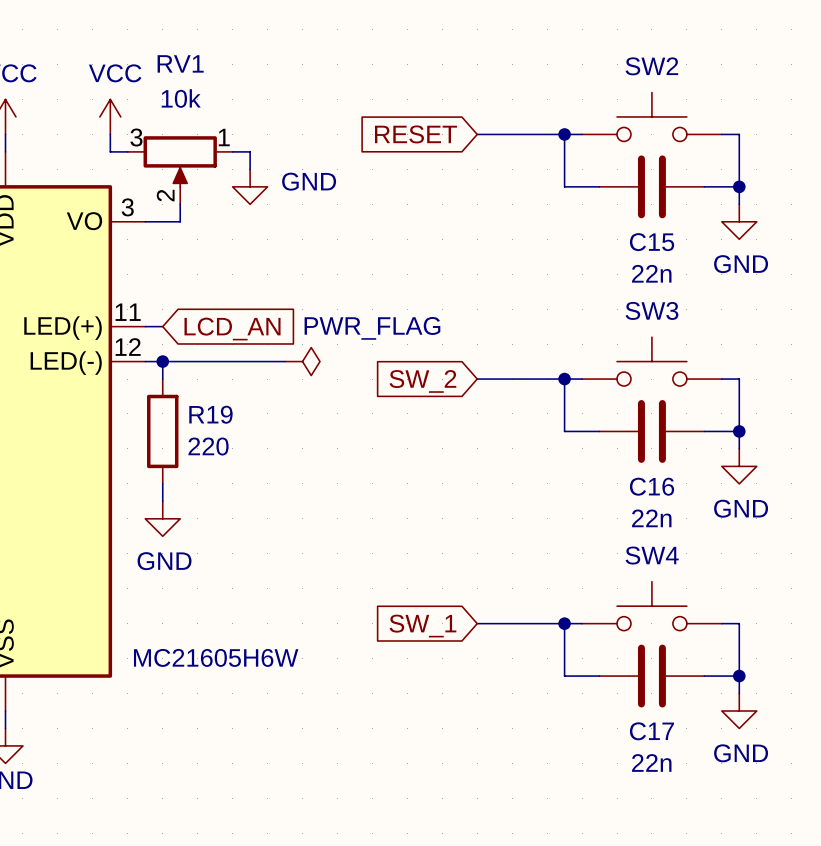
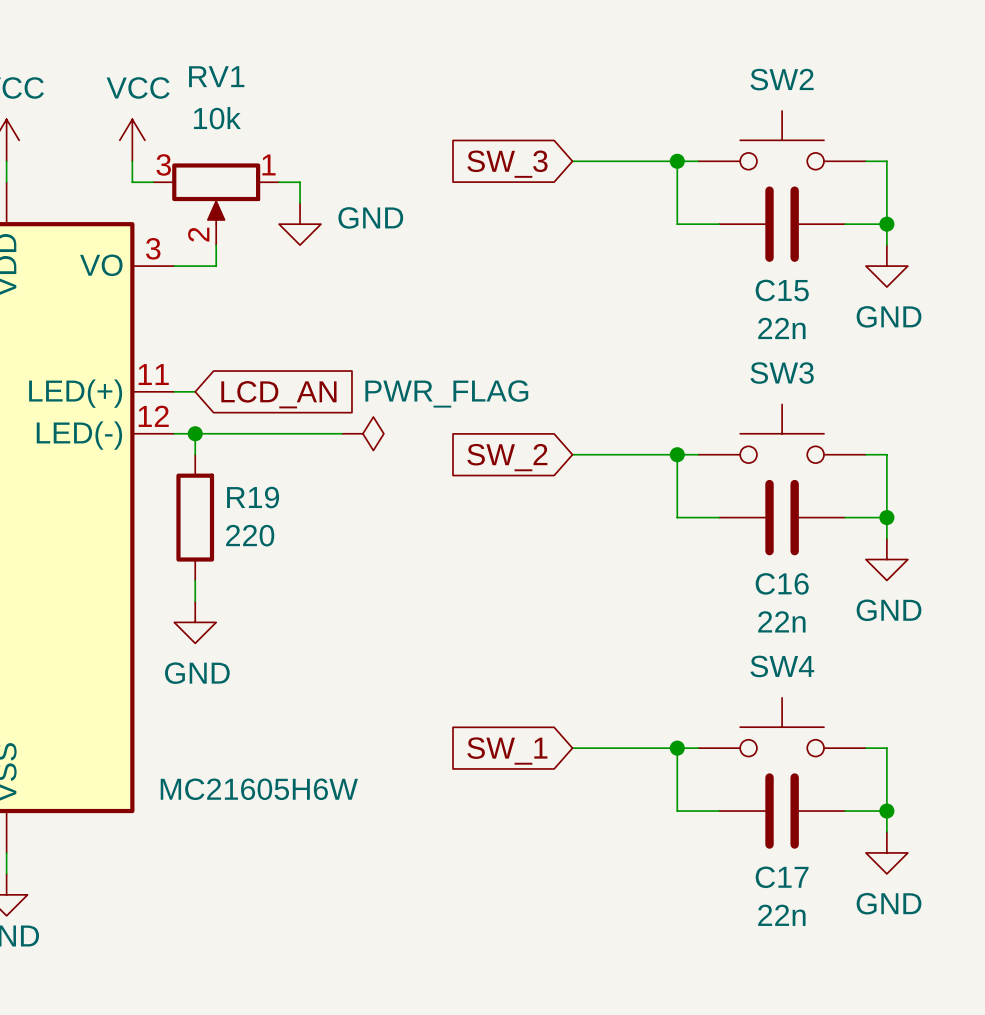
global label: RESET (415, 134) -> SW_3 (507, 164)

